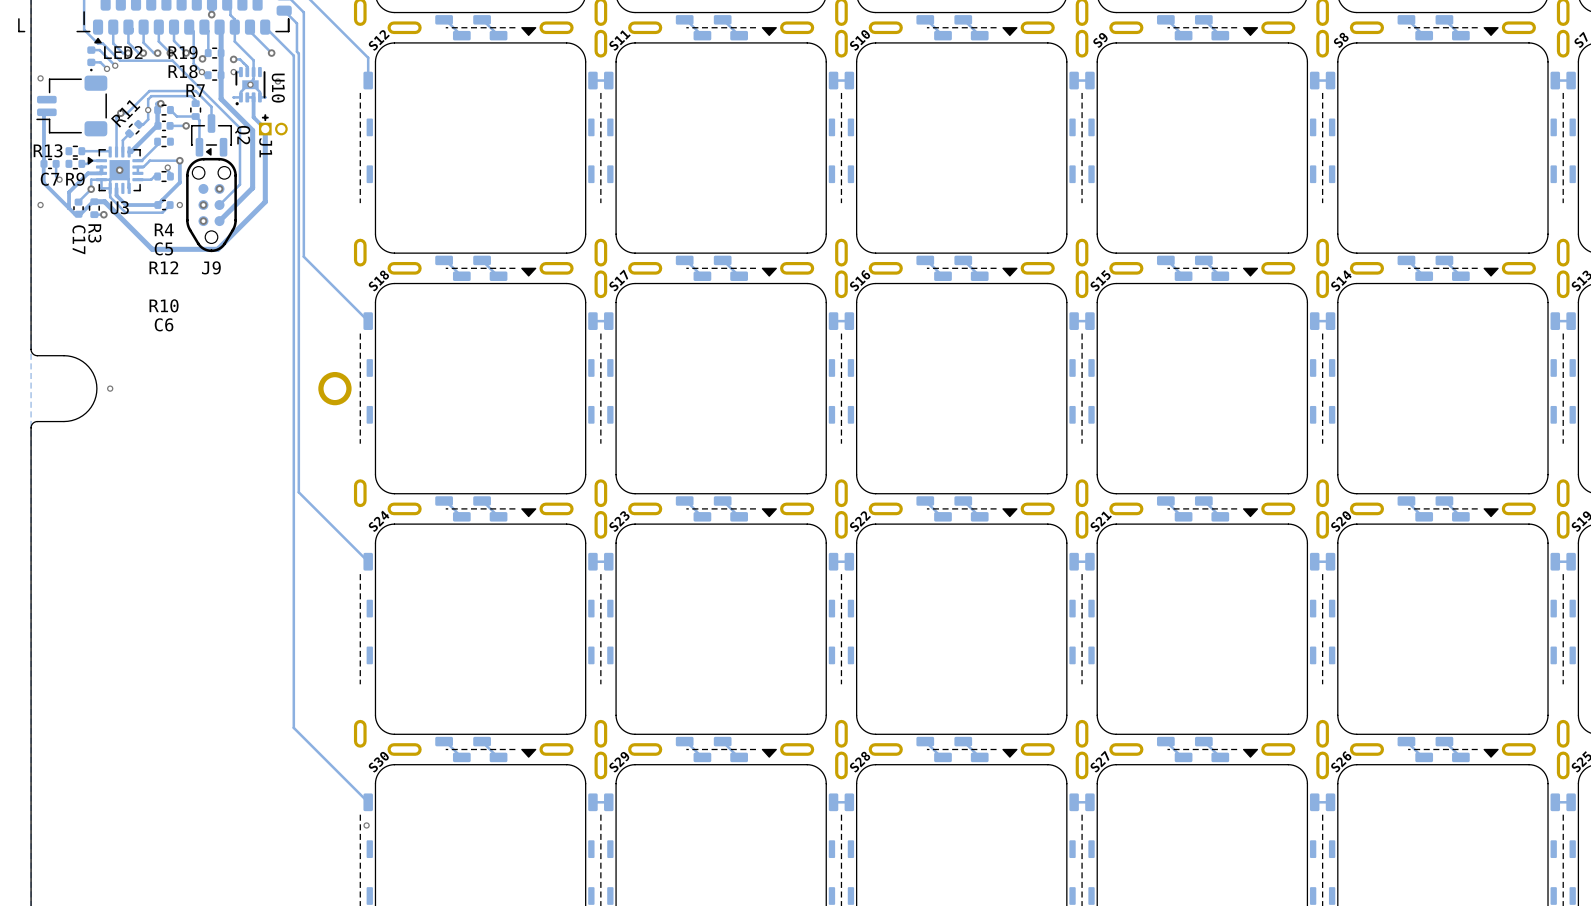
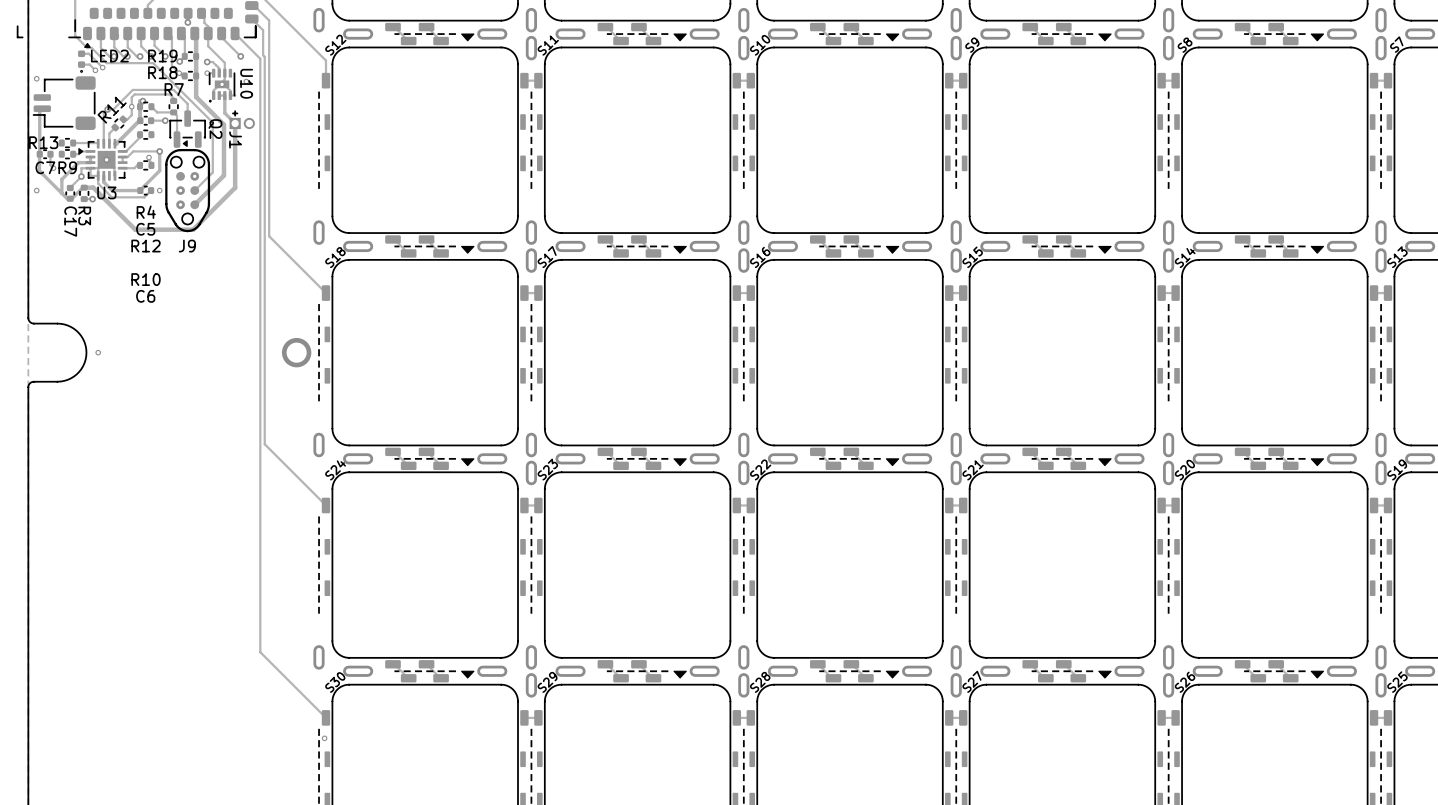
track: (240, 97) (233, 97) -> none

